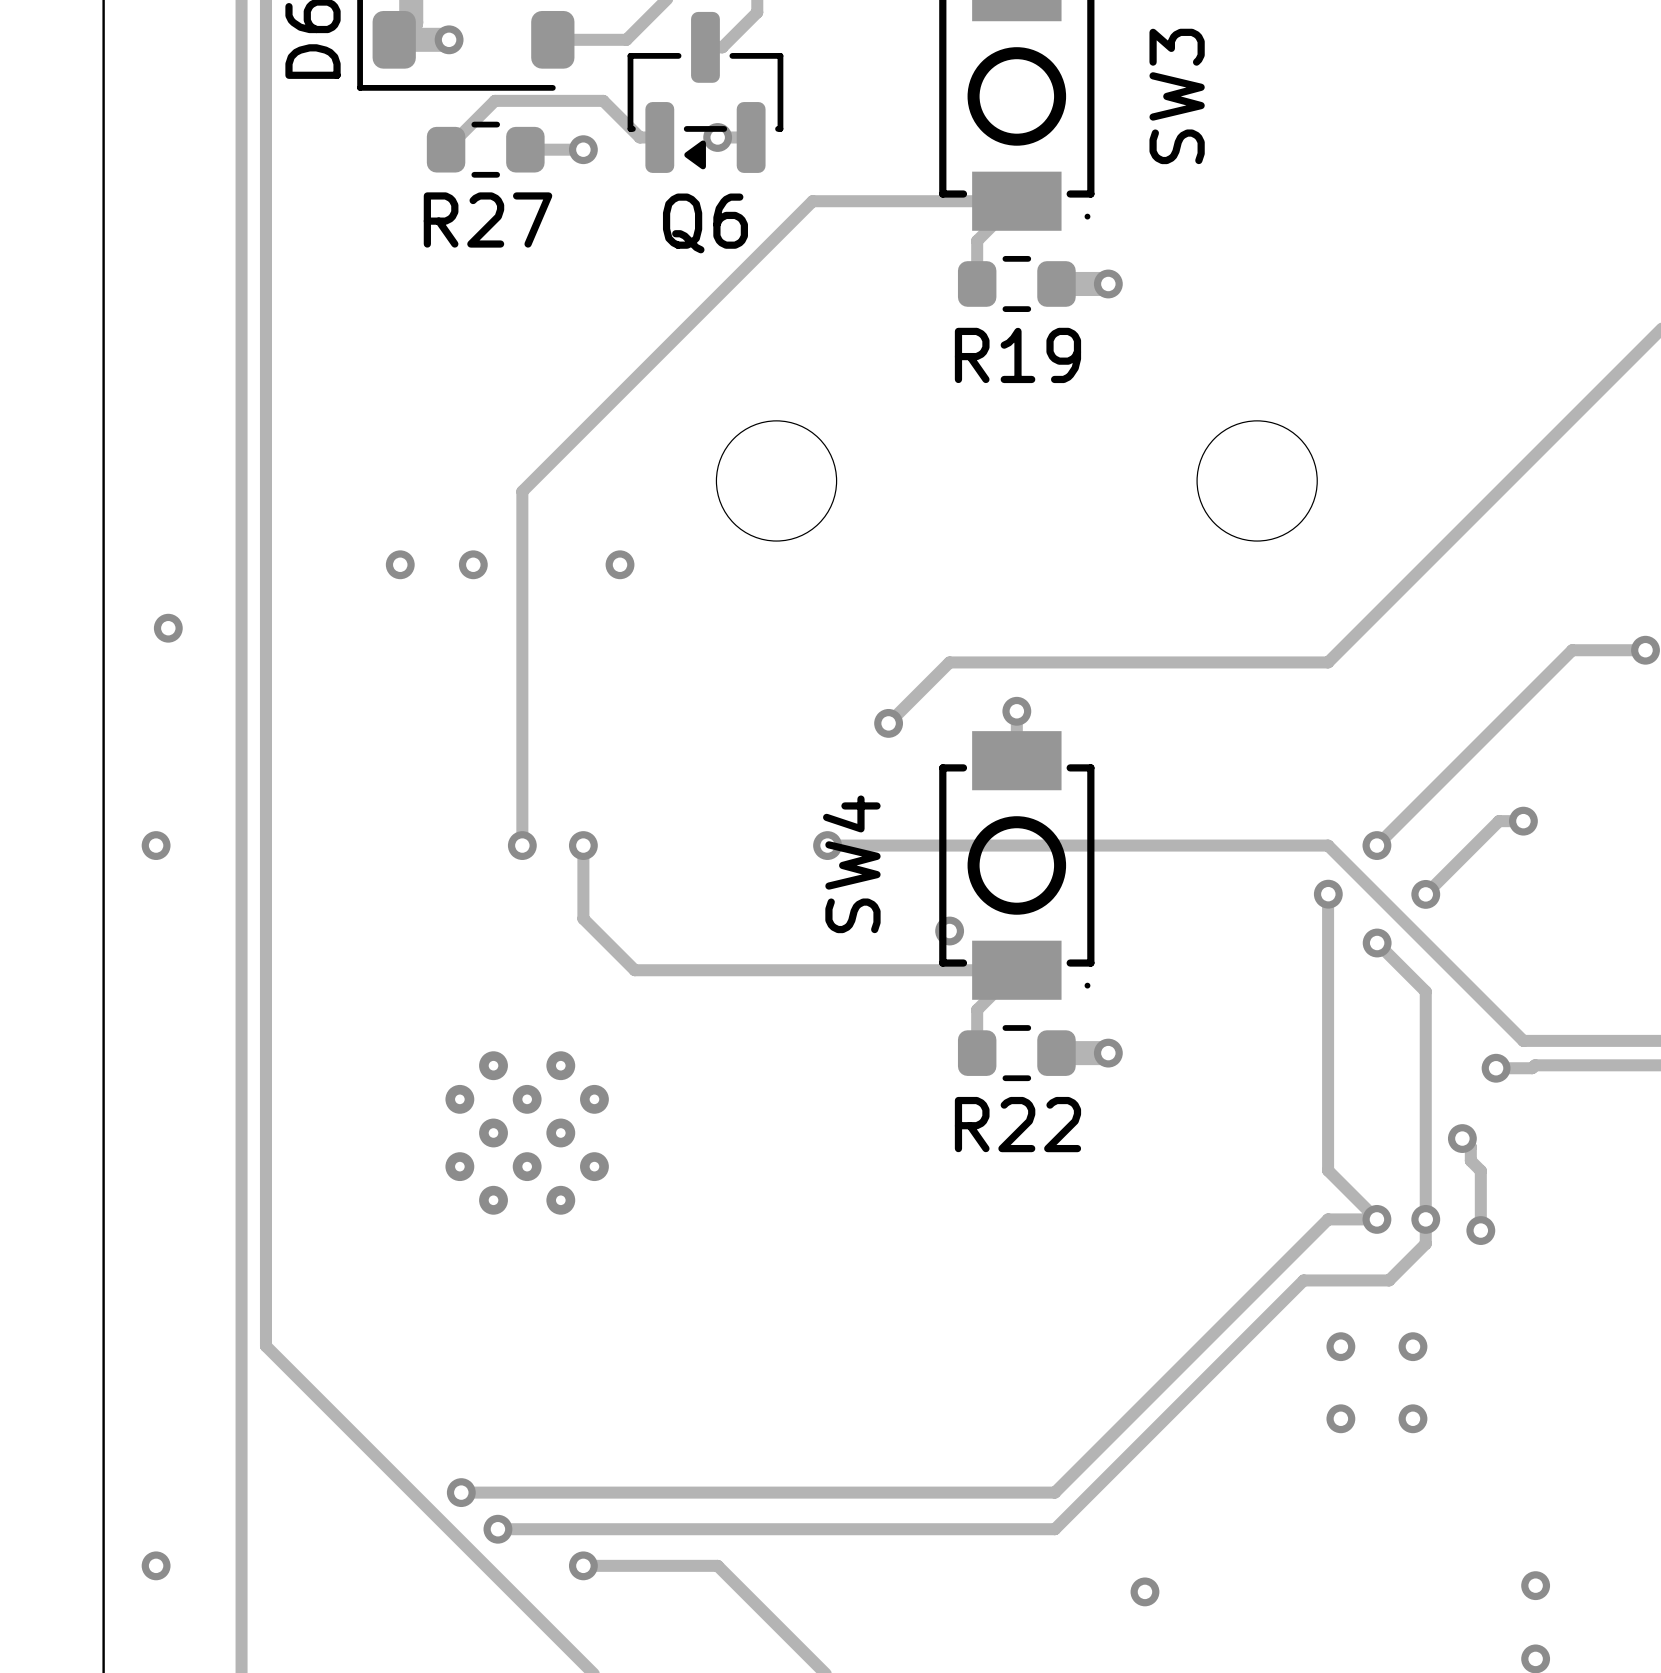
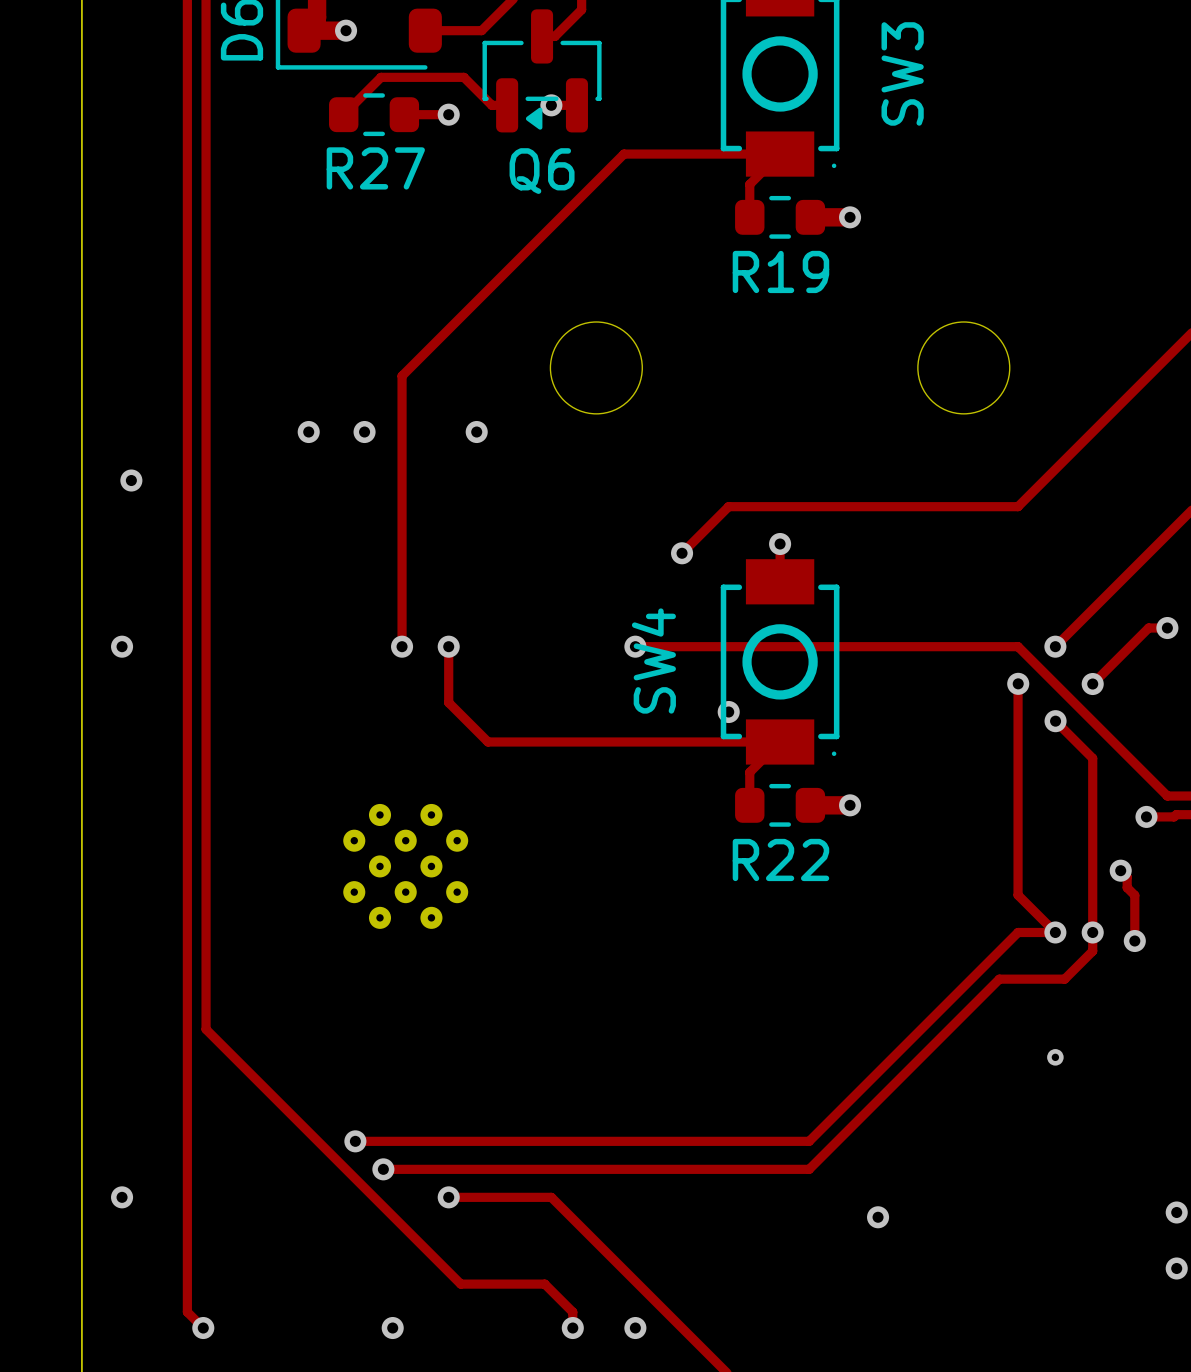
via: (1340, 1346) -> none
via: (1412, 1346) -> none
via: none -> (1055, 1057)
via: (1340, 1418) -> none
via: (1412, 1418) -> none

